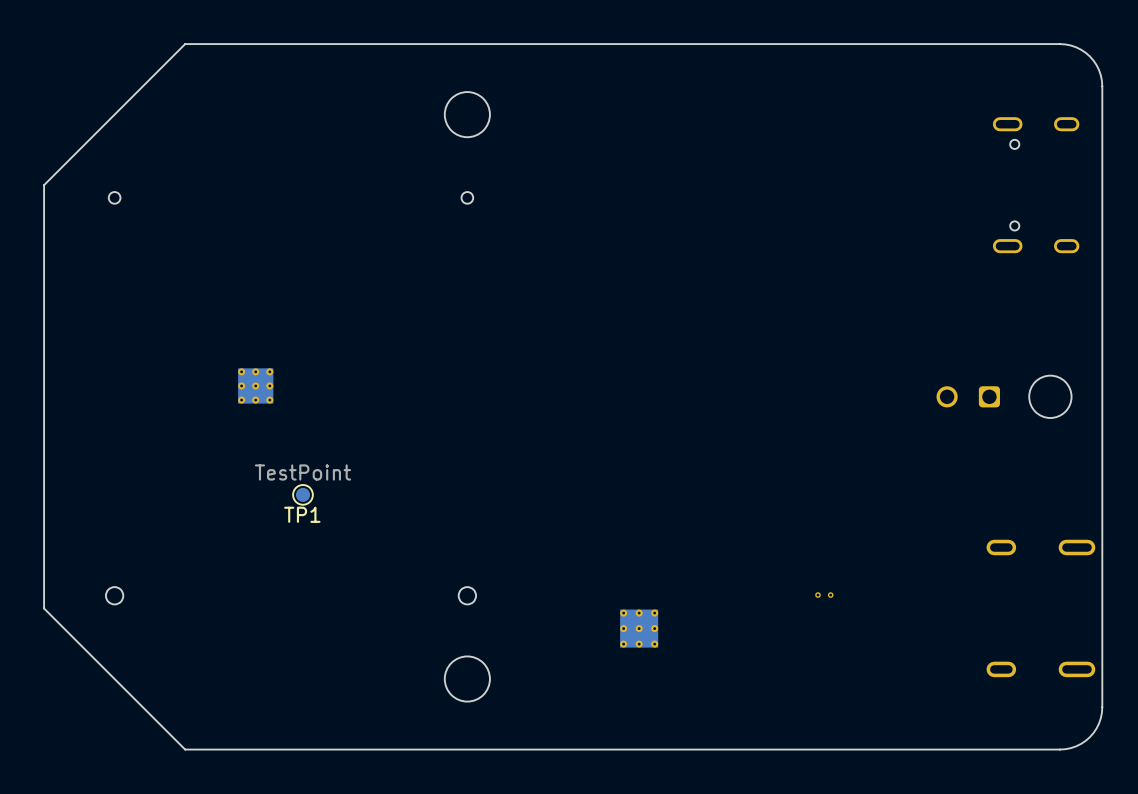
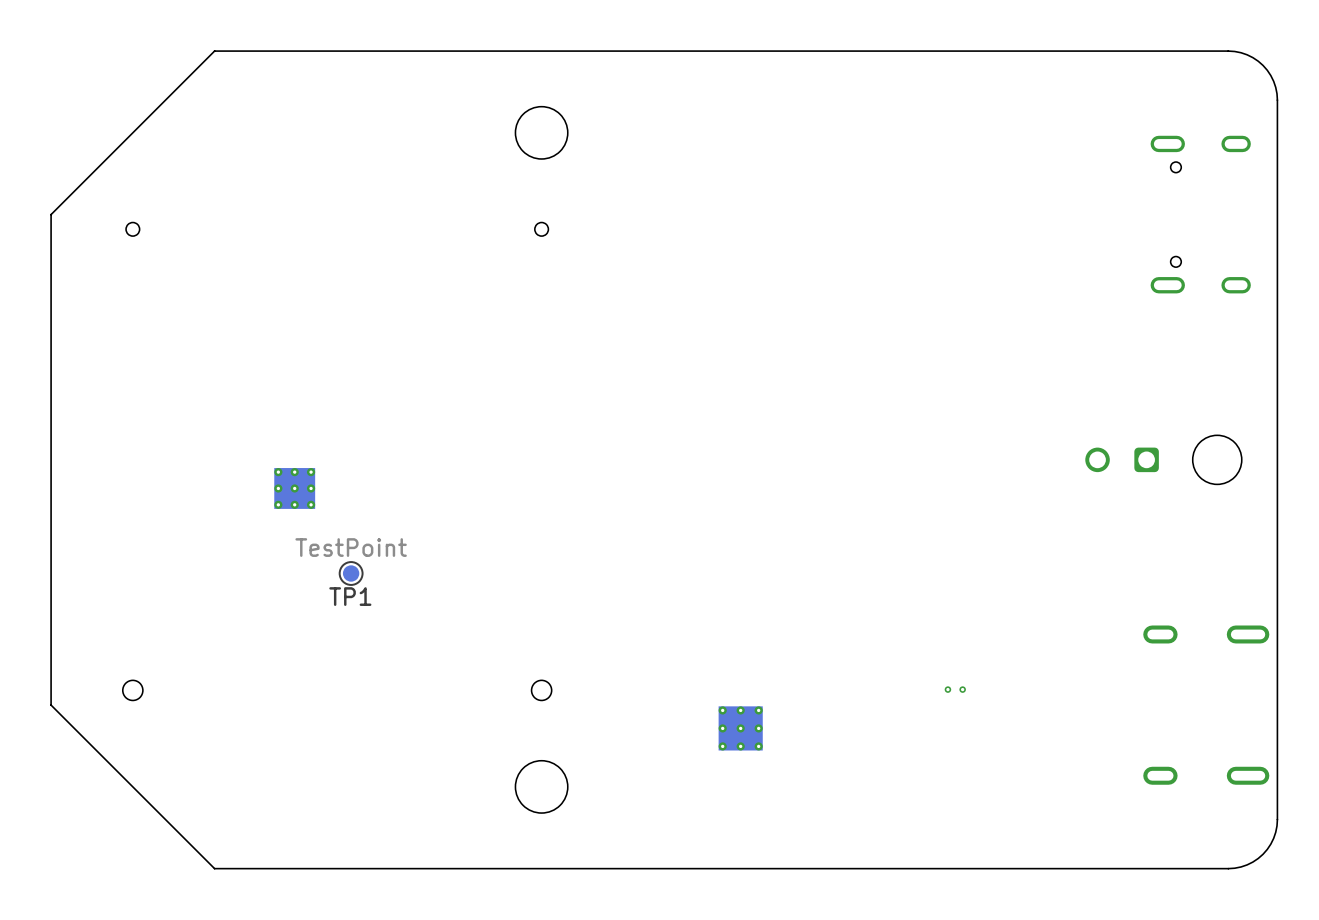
part position: (255, 385) -> (294, 488)

